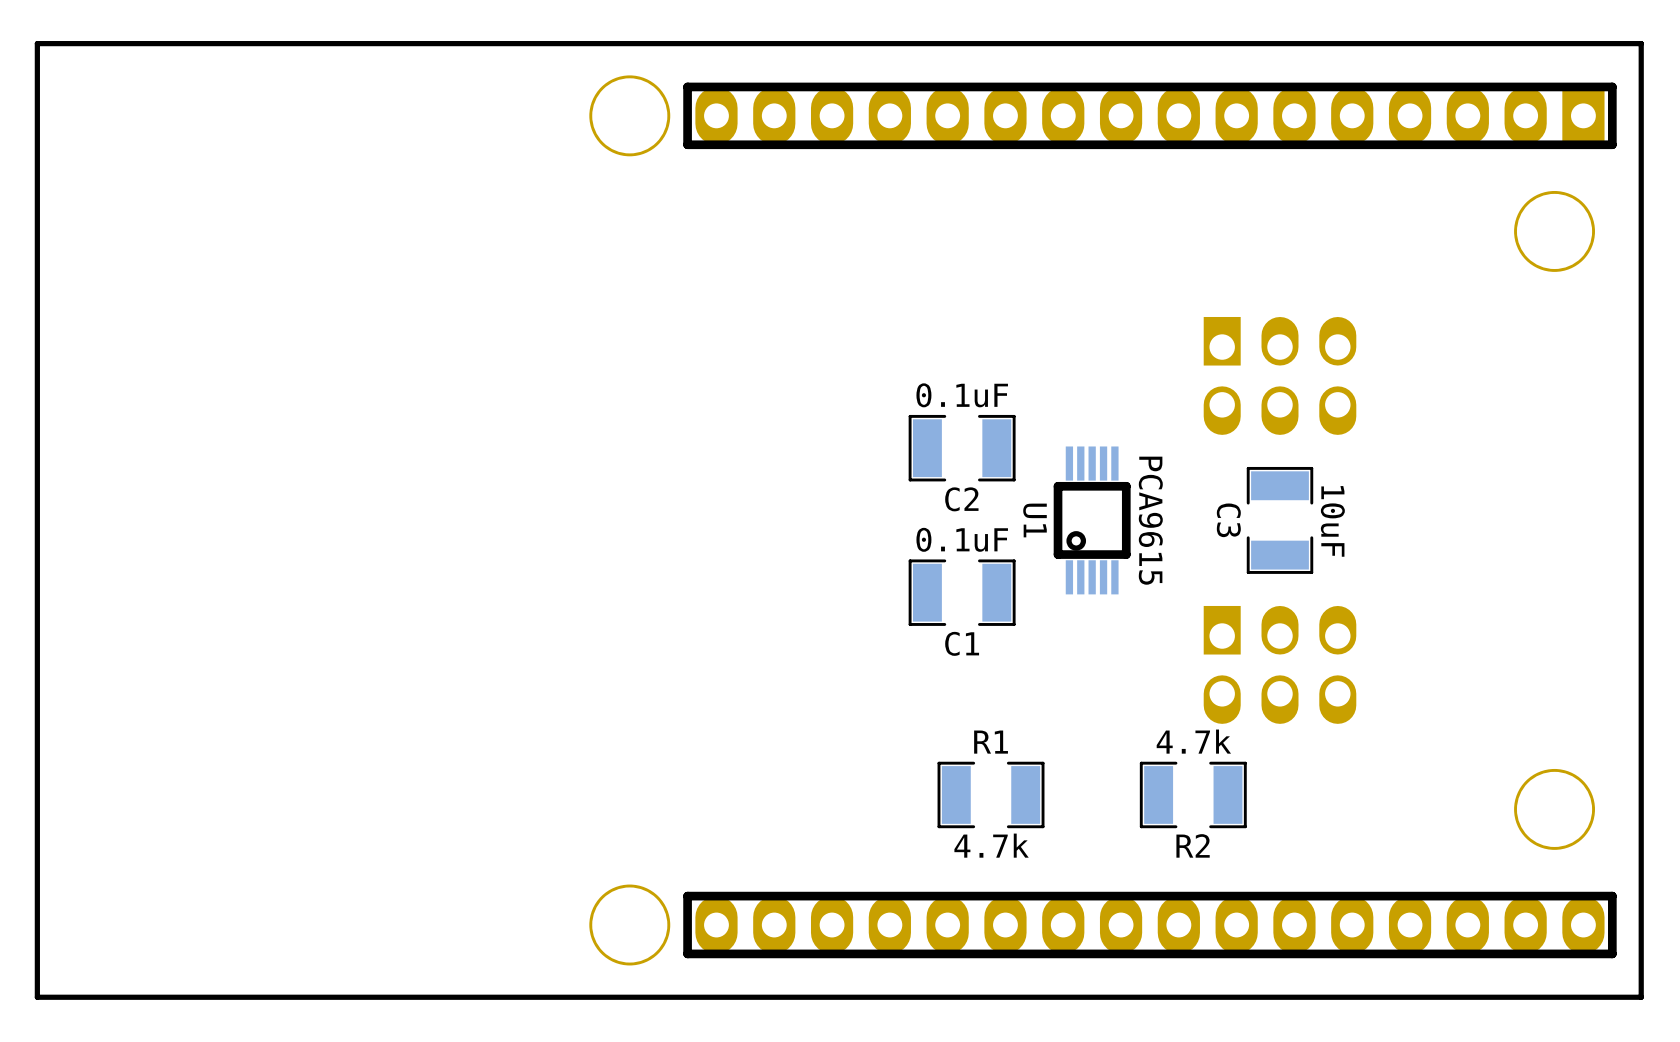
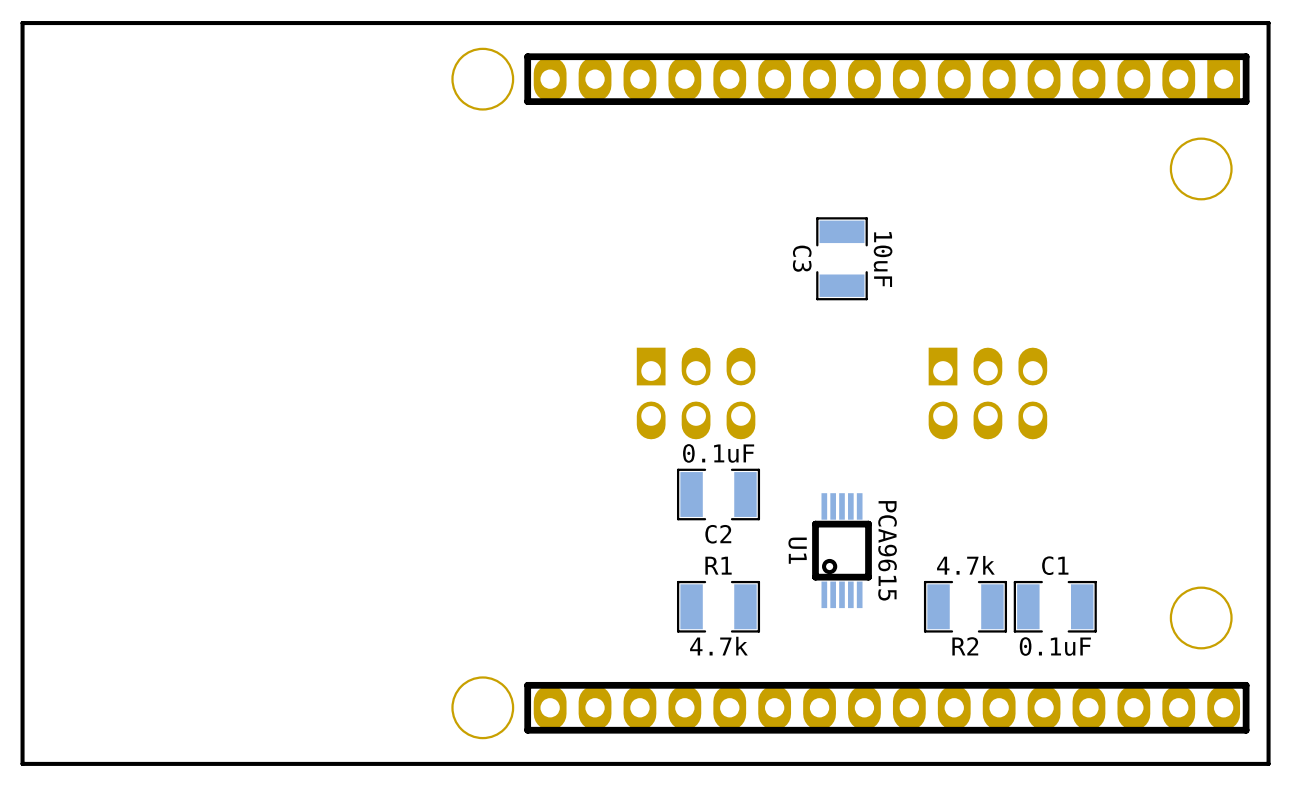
part: (1280, 375) -> none
C2 position: (962, 448) -> (718, 494)
part: none -> (696, 393)
U1 position: (1092, 520) -> (842, 550)
C3 position: (1280, 520) -> (842, 258)
part: none -> (987, 393)
C1 value position: 0.1uF (962, 539) -> 0.1uF (1055, 646)
C1 position: (962, 592) -> (1055, 606)
C1 name position: C1 (962, 643) -> C1 (1055, 565)
part: (1280, 664) -> none
R1 position: (991, 794) -> (718, 606)
R2 position: (1193, 794) -> (965, 606)

